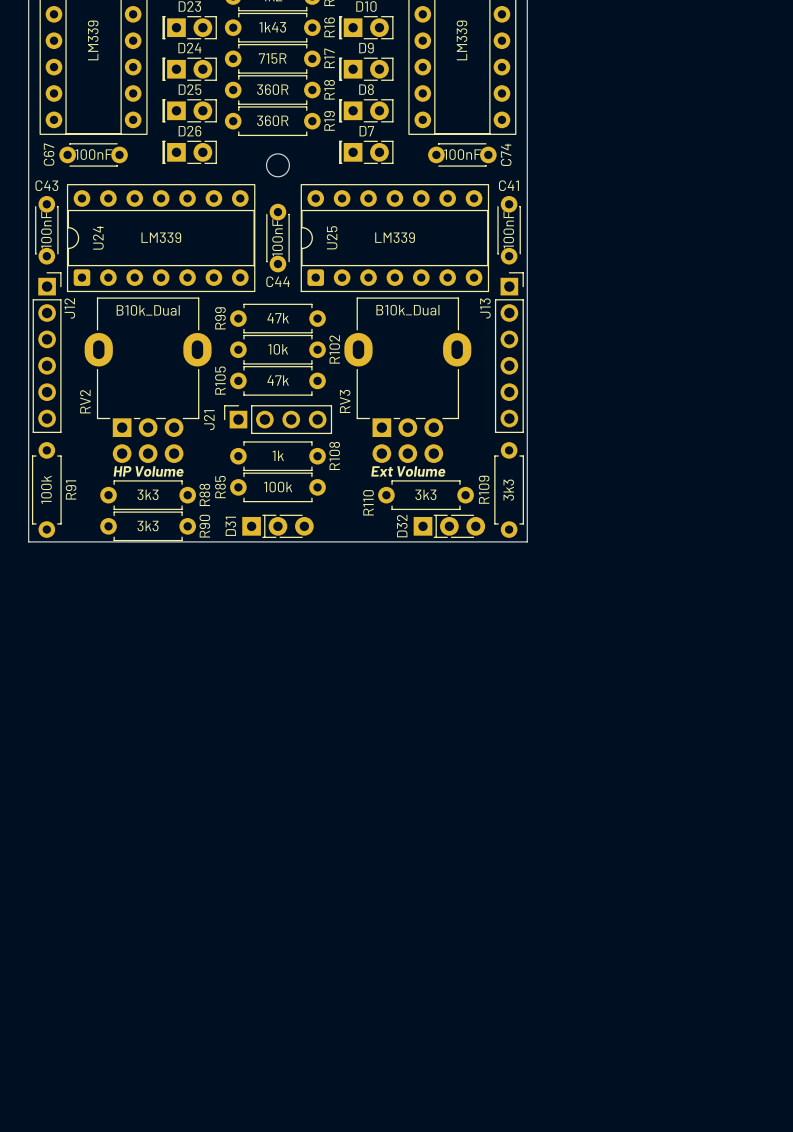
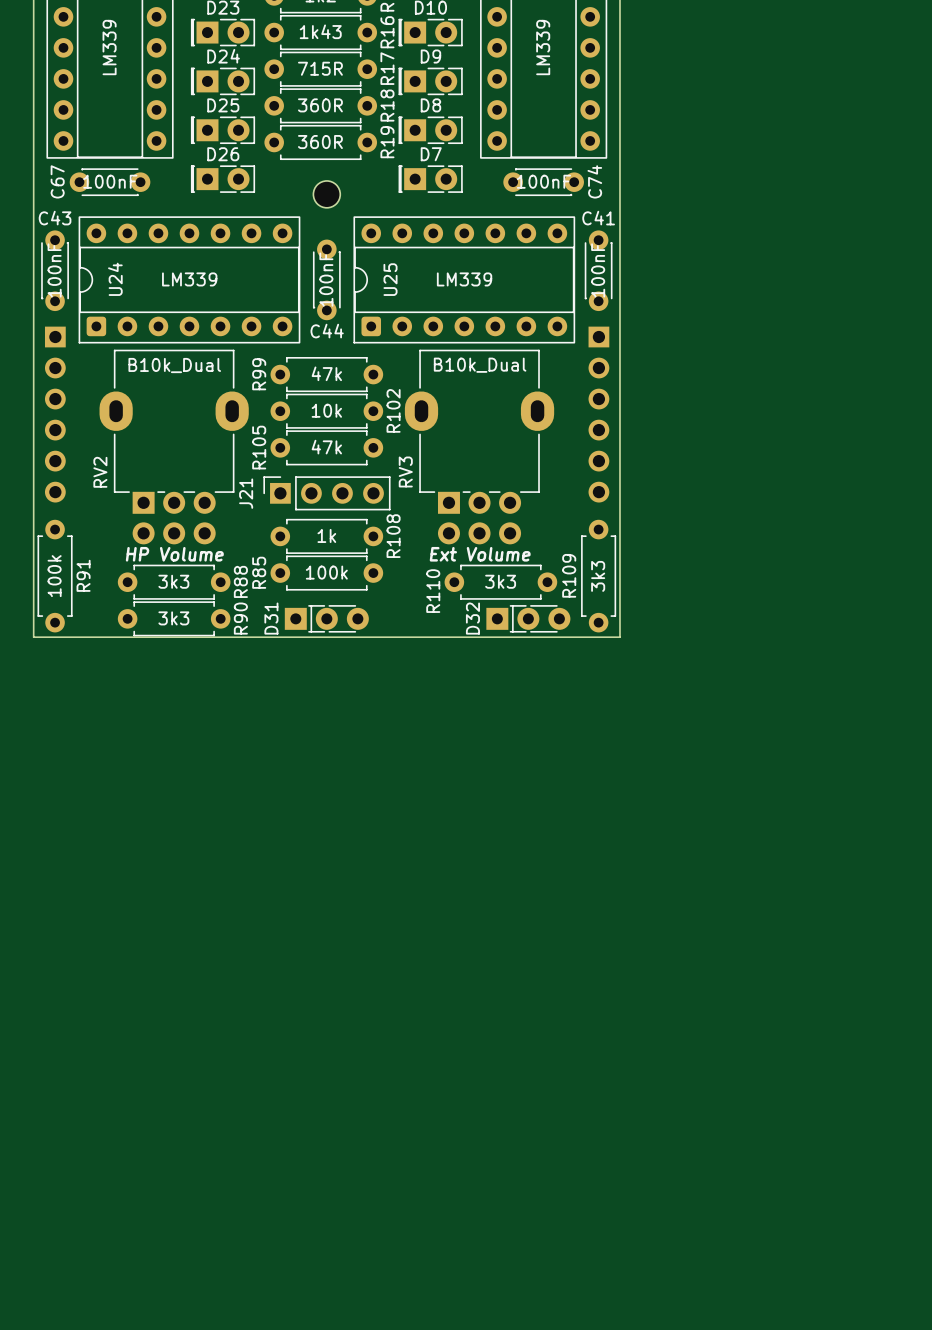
J12 side: top (47, 352) -> bottom (55, 414)
J13 side: top (509, 352) -> bottom (598, 414)

